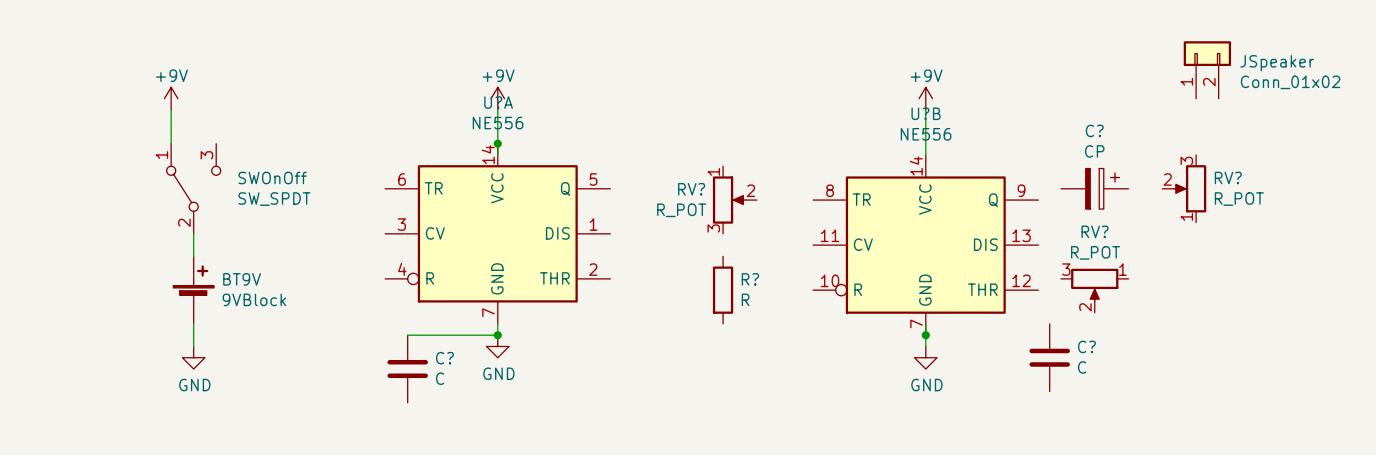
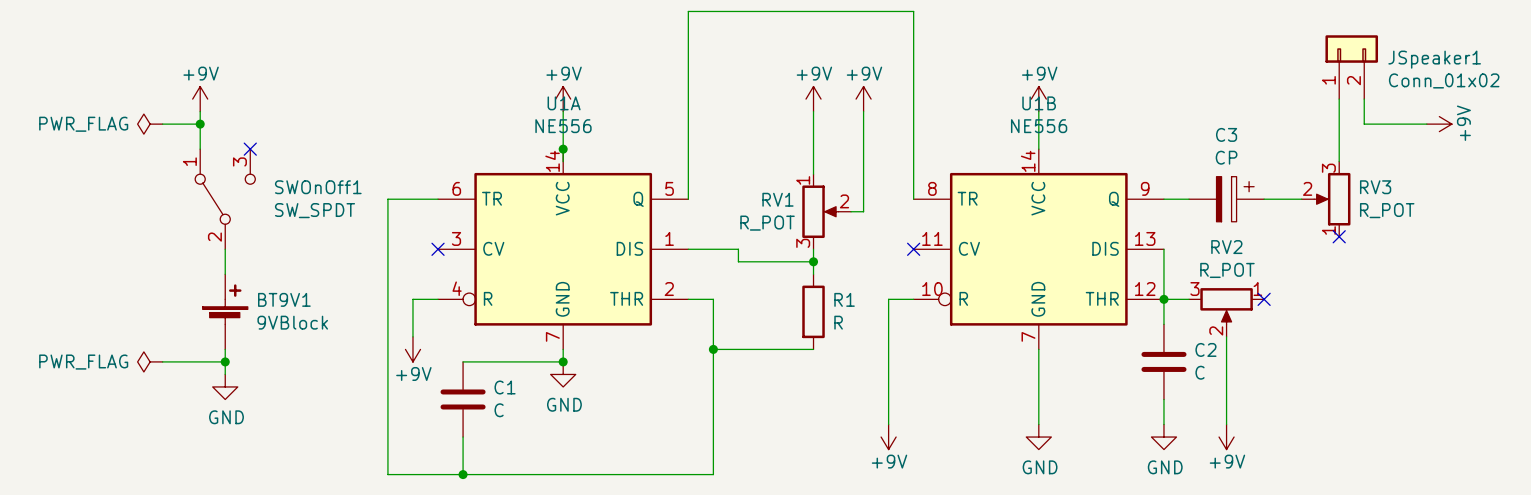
JSpeaker name: JSpeaker (1277, 63) -> JSpeaker1 (1434, 59)
power symbol: none -> +9V (813, 99)
power symbol: none -> +9V (863, 99)
wire: none -> (1339, 99) (1339, 161)
wire: none -> (1364, 99) (1364, 124) (1426, 124)
U?A name: U?A (498, 102) -> U1A (564, 103)
wire: none -> (813, 111) (813, 174)
wire: none -> (863, 111) (863, 211) (851, 211)
power symbol: none -> PWR_FLAG (150, 124)
wire: none -> (162, 124) (200, 124)
junction: none -> (200, 124)
power symbol: none -> +9V (1439, 124)
C? name: C? (1094, 130) -> C3 (1226, 134)
no-connect mark: none -> (250, 149)
SWOnOff name: SWOnOff (272, 178) -> SWOnOff1 (318, 187)
RV? name: RV? (1228, 178) -> RV3 (1375, 187)
wire: none -> (438, 199) (387, 199) (387, 474) (713, 474) (713, 299) (688, 299)
wire: none -> (688, 199) (688, 11) (913, 11) (913, 199)
wire: none -> (1163, 199) (1189, 199)
wire: none -> (1264, 199) (1301, 199)
RV? name: RV? (691, 189) -> RV1 (777, 199)
no-connect mark: none -> (1339, 236)
RV? name: RV? (1095, 231) -> RV2 (1226, 247)
no-connect mark: none -> (438, 249)
wire: none -> (688, 249) (738, 249) (738, 261) (813, 261)
wire: none -> (813, 249) (813, 274)
no-connect mark: none -> (913, 249)
U1B: none -> NE556 (1038, 249)
wire: none -> (1163, 249) (1163, 324)
junction: none -> (813, 261)
U?B: NE556 (925, 245) -> none
wire: none -> (438, 299) (412, 299) (412, 336)
wire: none -> (913, 299) (888, 299) (888, 424)
wire: none -> (1163, 299) (1189, 299)
junction: none -> (1163, 299)
no-connect mark: none -> (1264, 299)
BT9V name: BT9V (242, 279) -> BT9V1 (284, 299)
R? name: R? (750, 279) -> R1 (844, 299)
wire: none -> (1226, 336) (1226, 424)
power symbol: none -> +9V (412, 349)
wire: none -> (713, 349) (813, 349)
junction: none -> (713, 349)
power symbol: none -> PWR_FLAG (150, 361)
wire: none -> (162, 361) (225, 361)
junction: none -> (225, 361)
junction: (925, 335) -> none
C2: none -> C (1163, 361)
wire: none -> (1038, 374) (1038, 424)
power symbol position: GND (925, 357) -> GND (1038, 437)
C?: C (1049, 357) -> none
C? name: C? (444, 358) -> C1 (505, 387)
wire: none -> (1163, 399) (1163, 424)
wire: none -> (463, 437) (463, 474)
power symbol: none -> +9V (888, 437)
power symbol: none -> GND (1163, 437)
power symbol: none -> +9V (1226, 437)
junction: none -> (463, 474)

